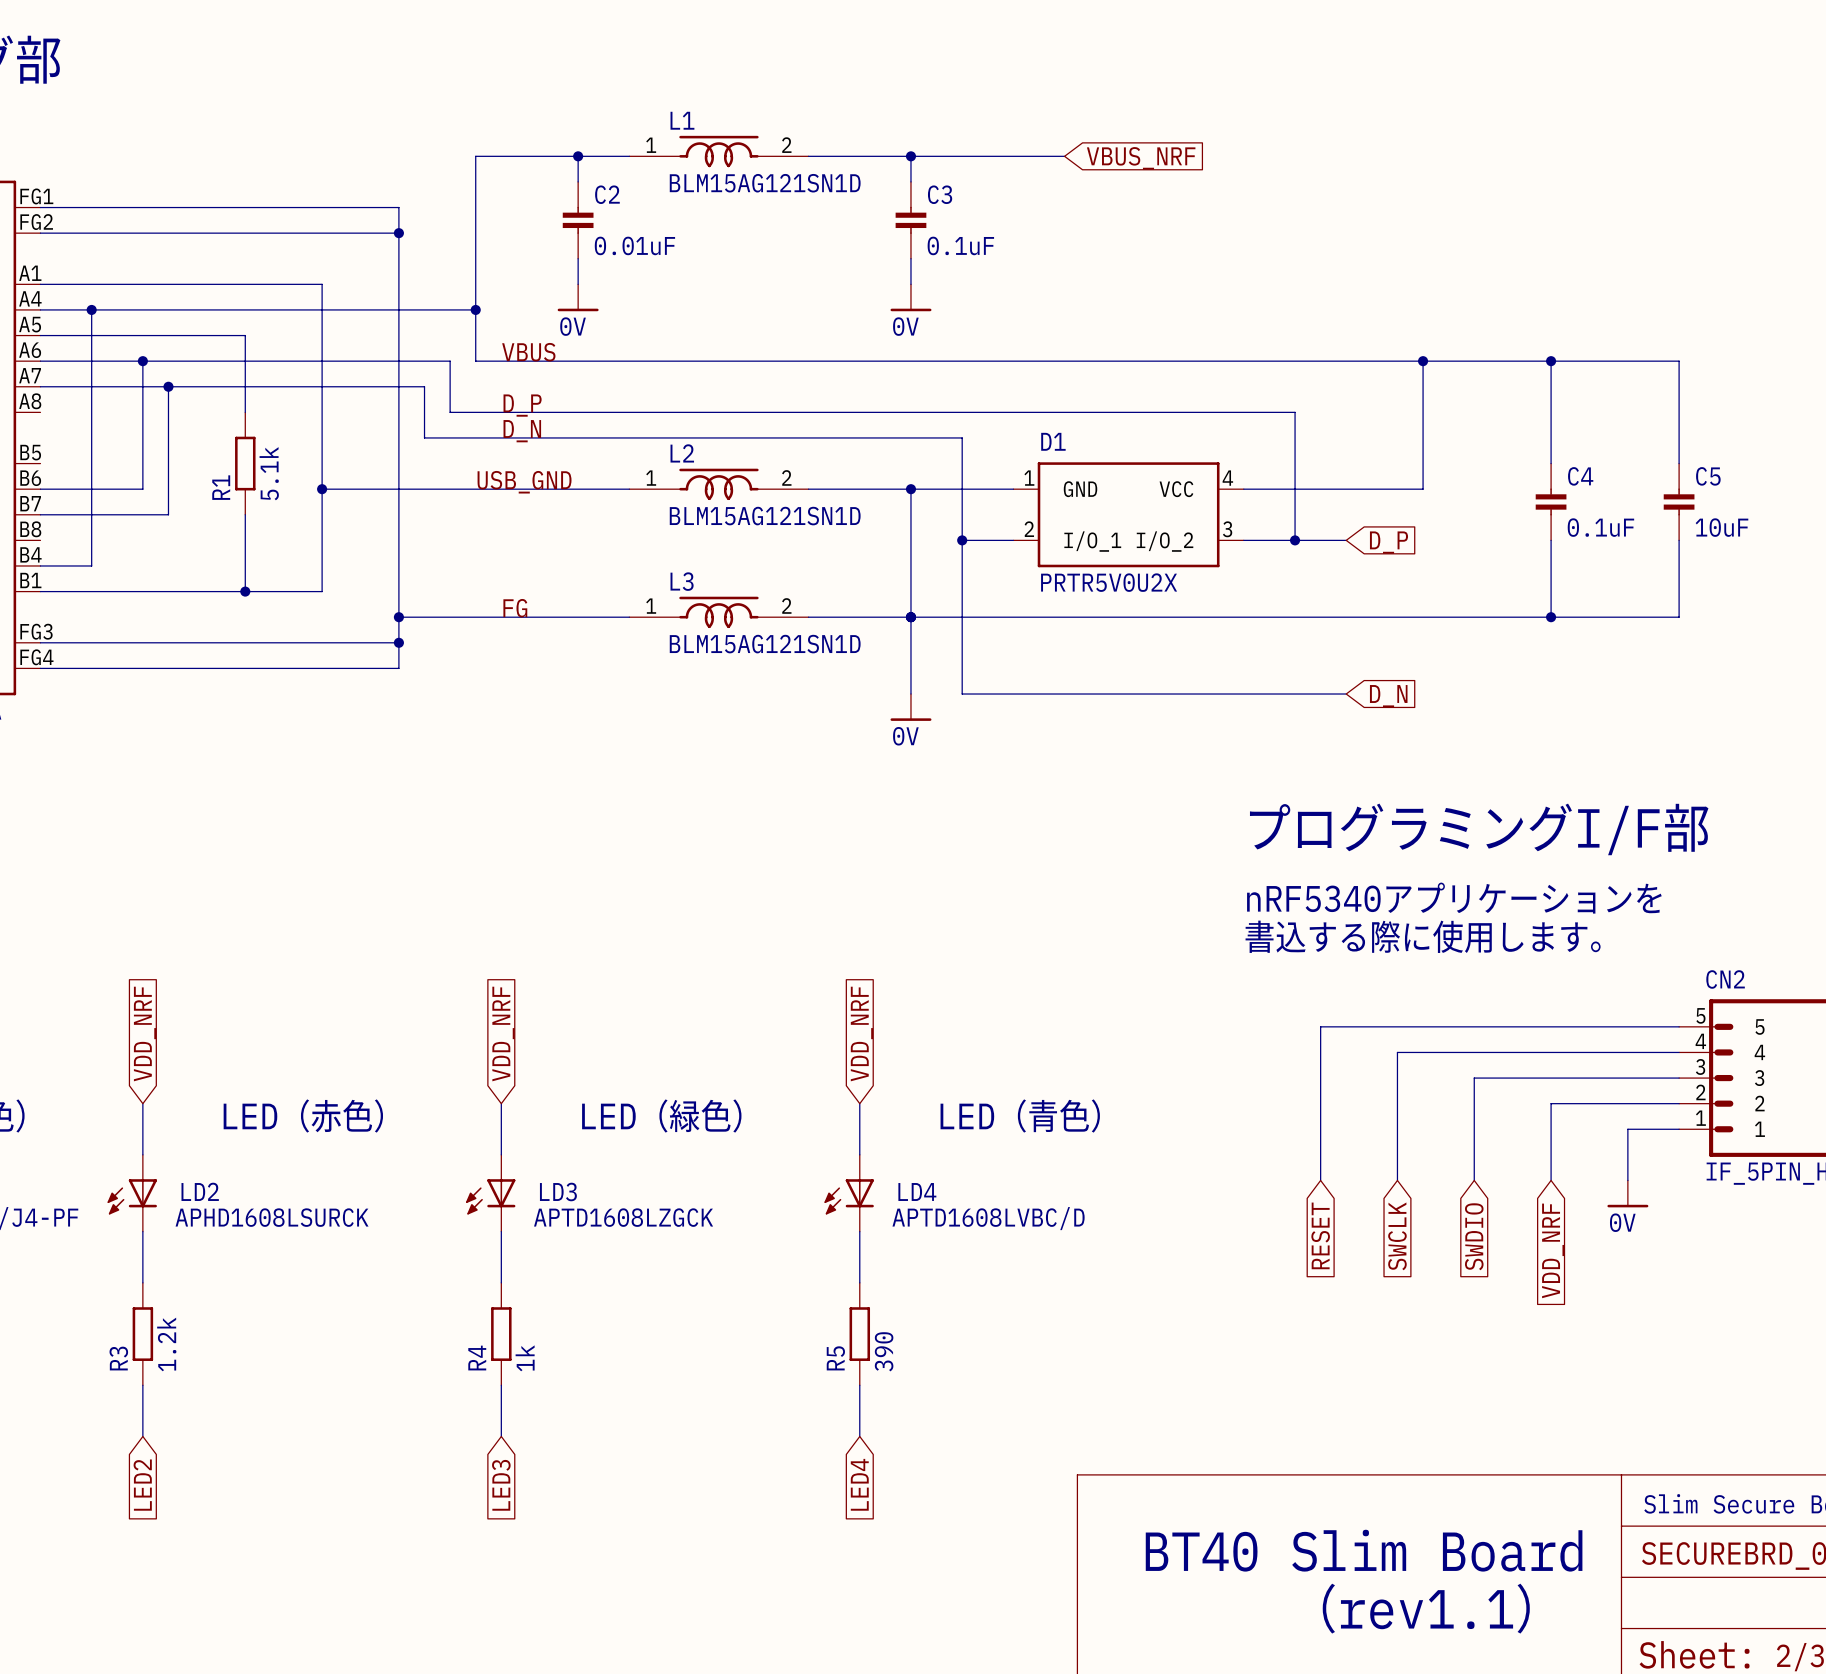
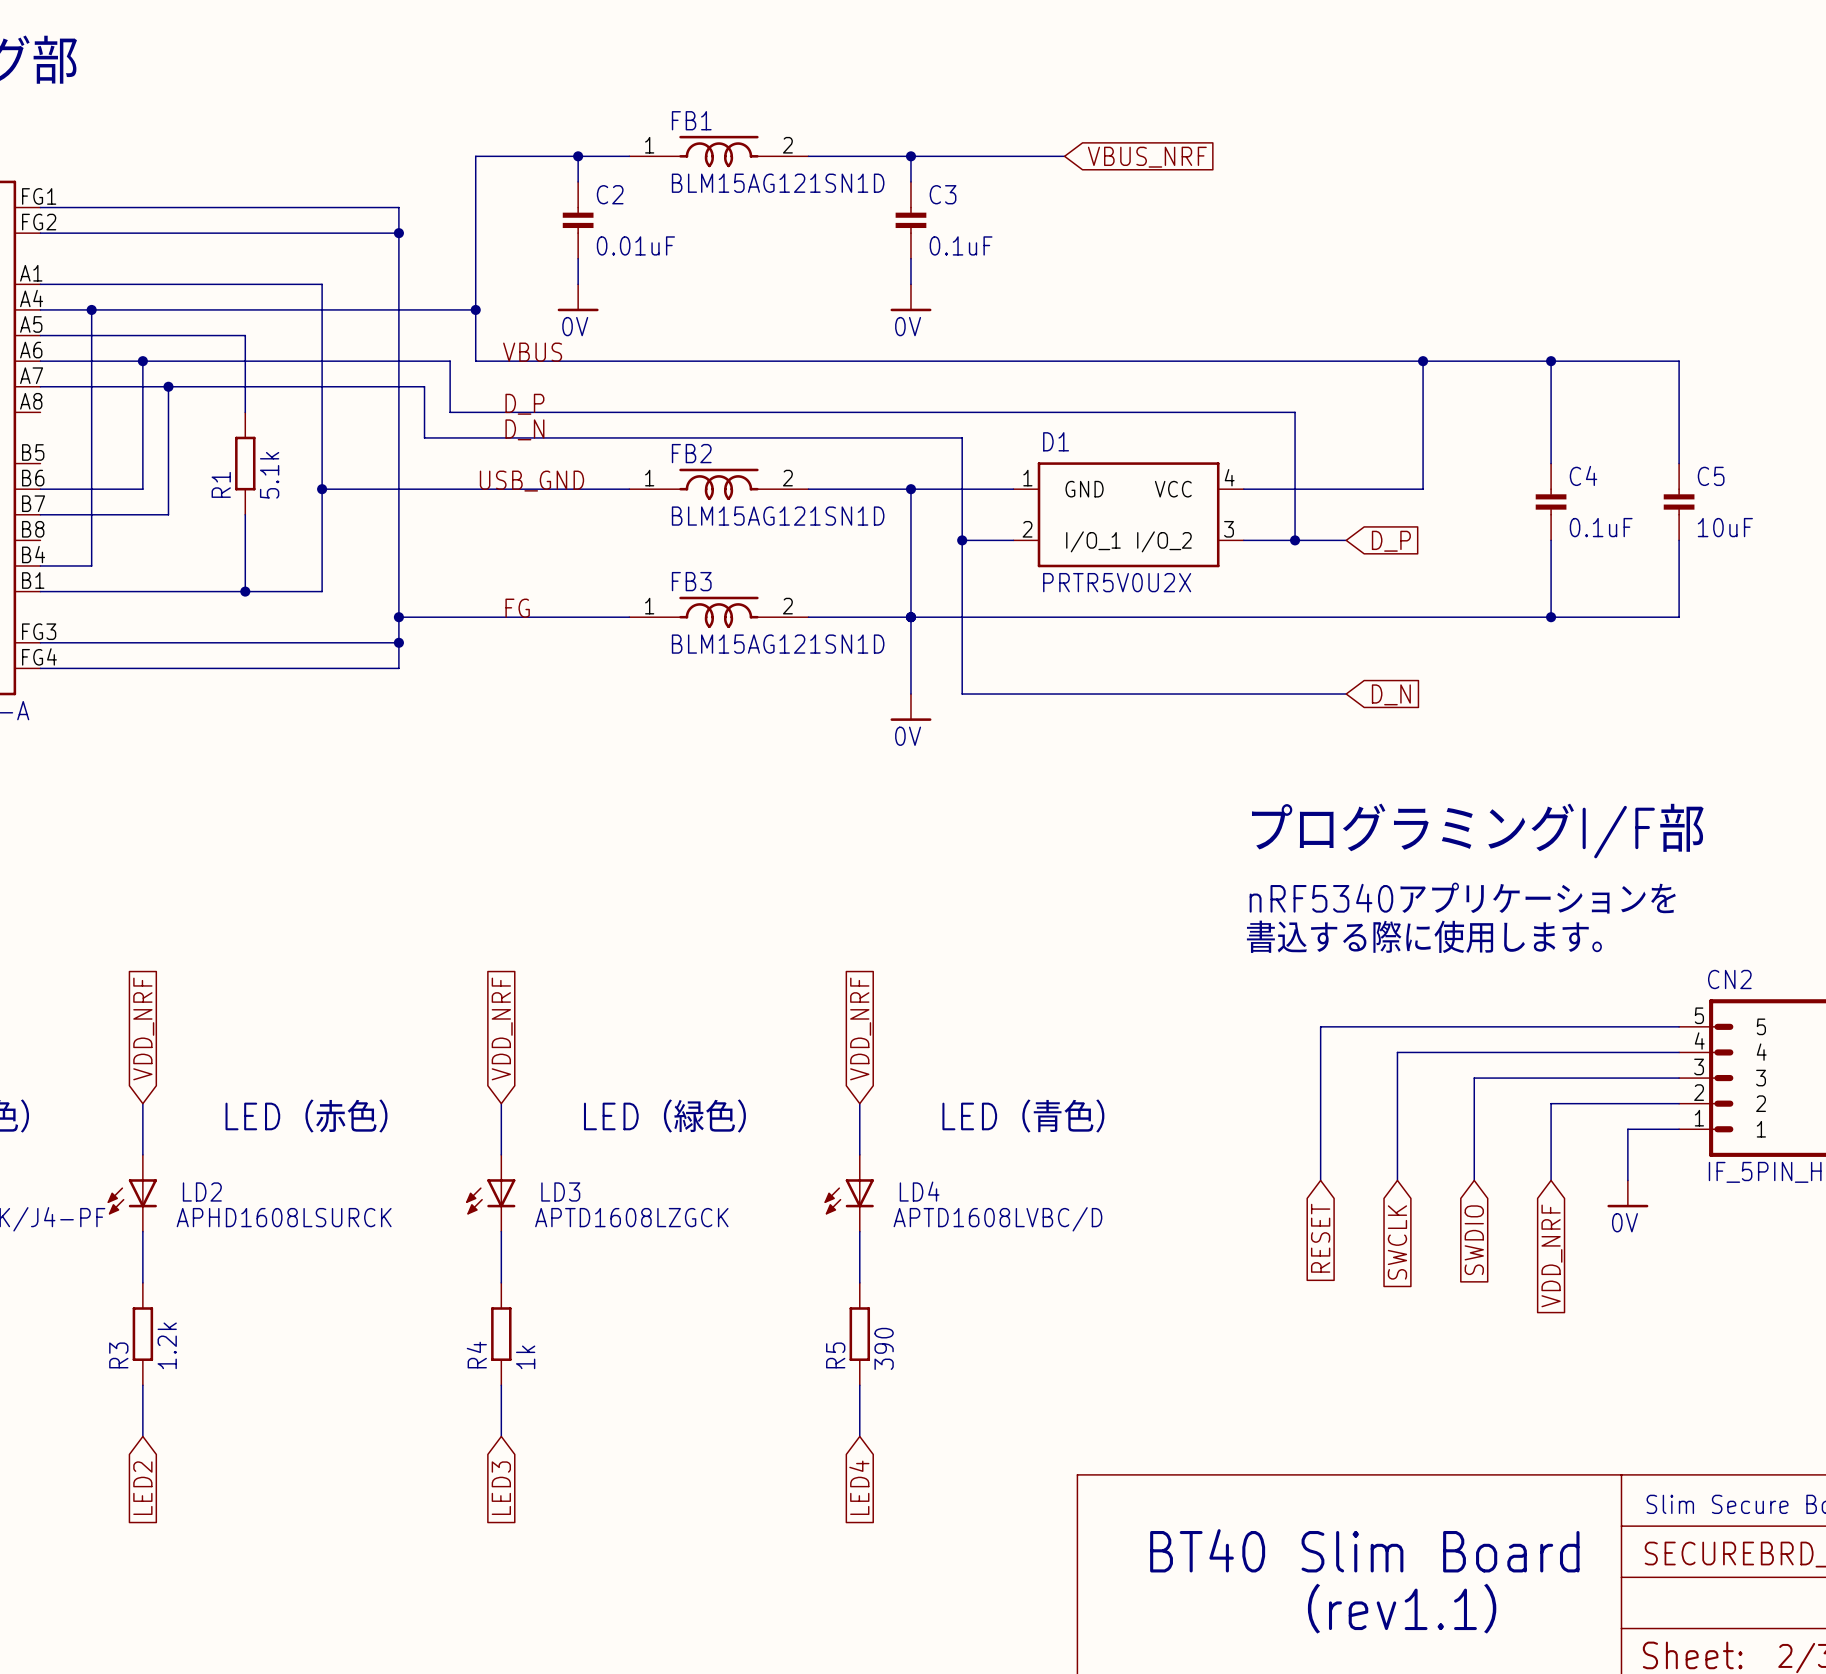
L1 name: L1 (682, 120) -> FB1 (691, 120)
L2 name: L2 (682, 453) -> FB2 (691, 453)
L3 name: L3 (682, 581) -> FB3 (691, 581)

